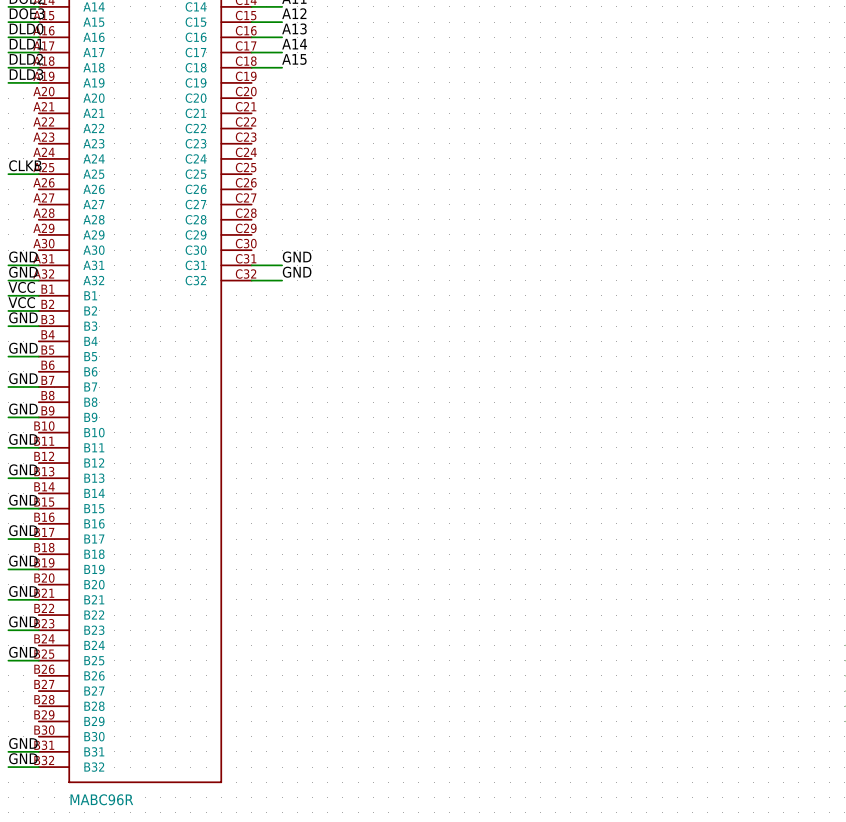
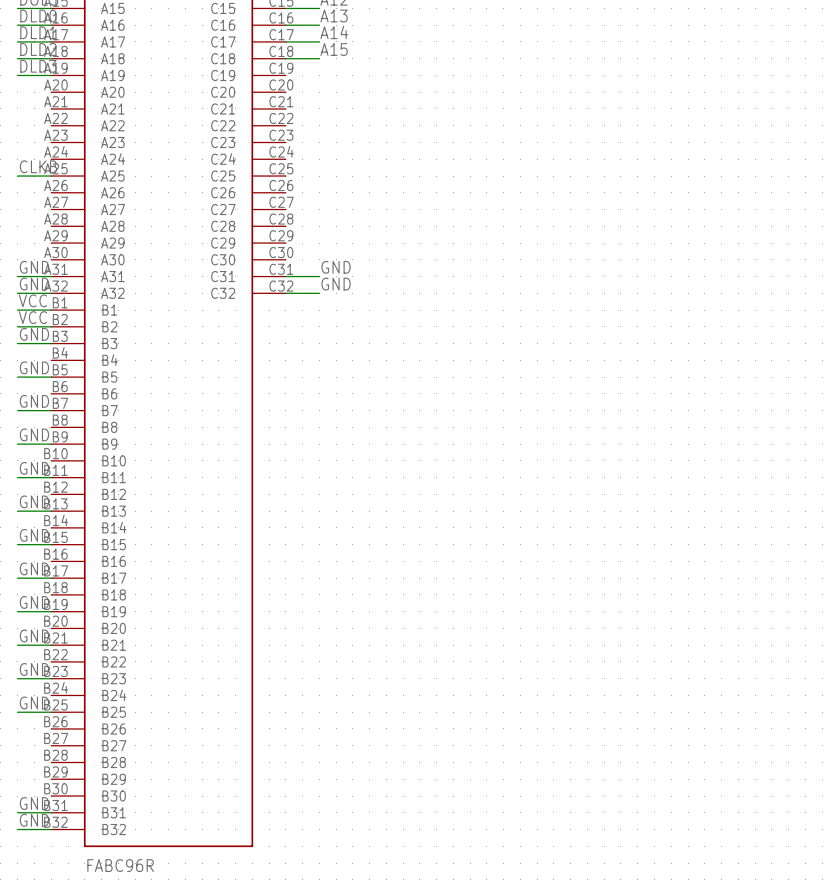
part value: MABC96R (101, 799) -> FABC96R (120, 865)

